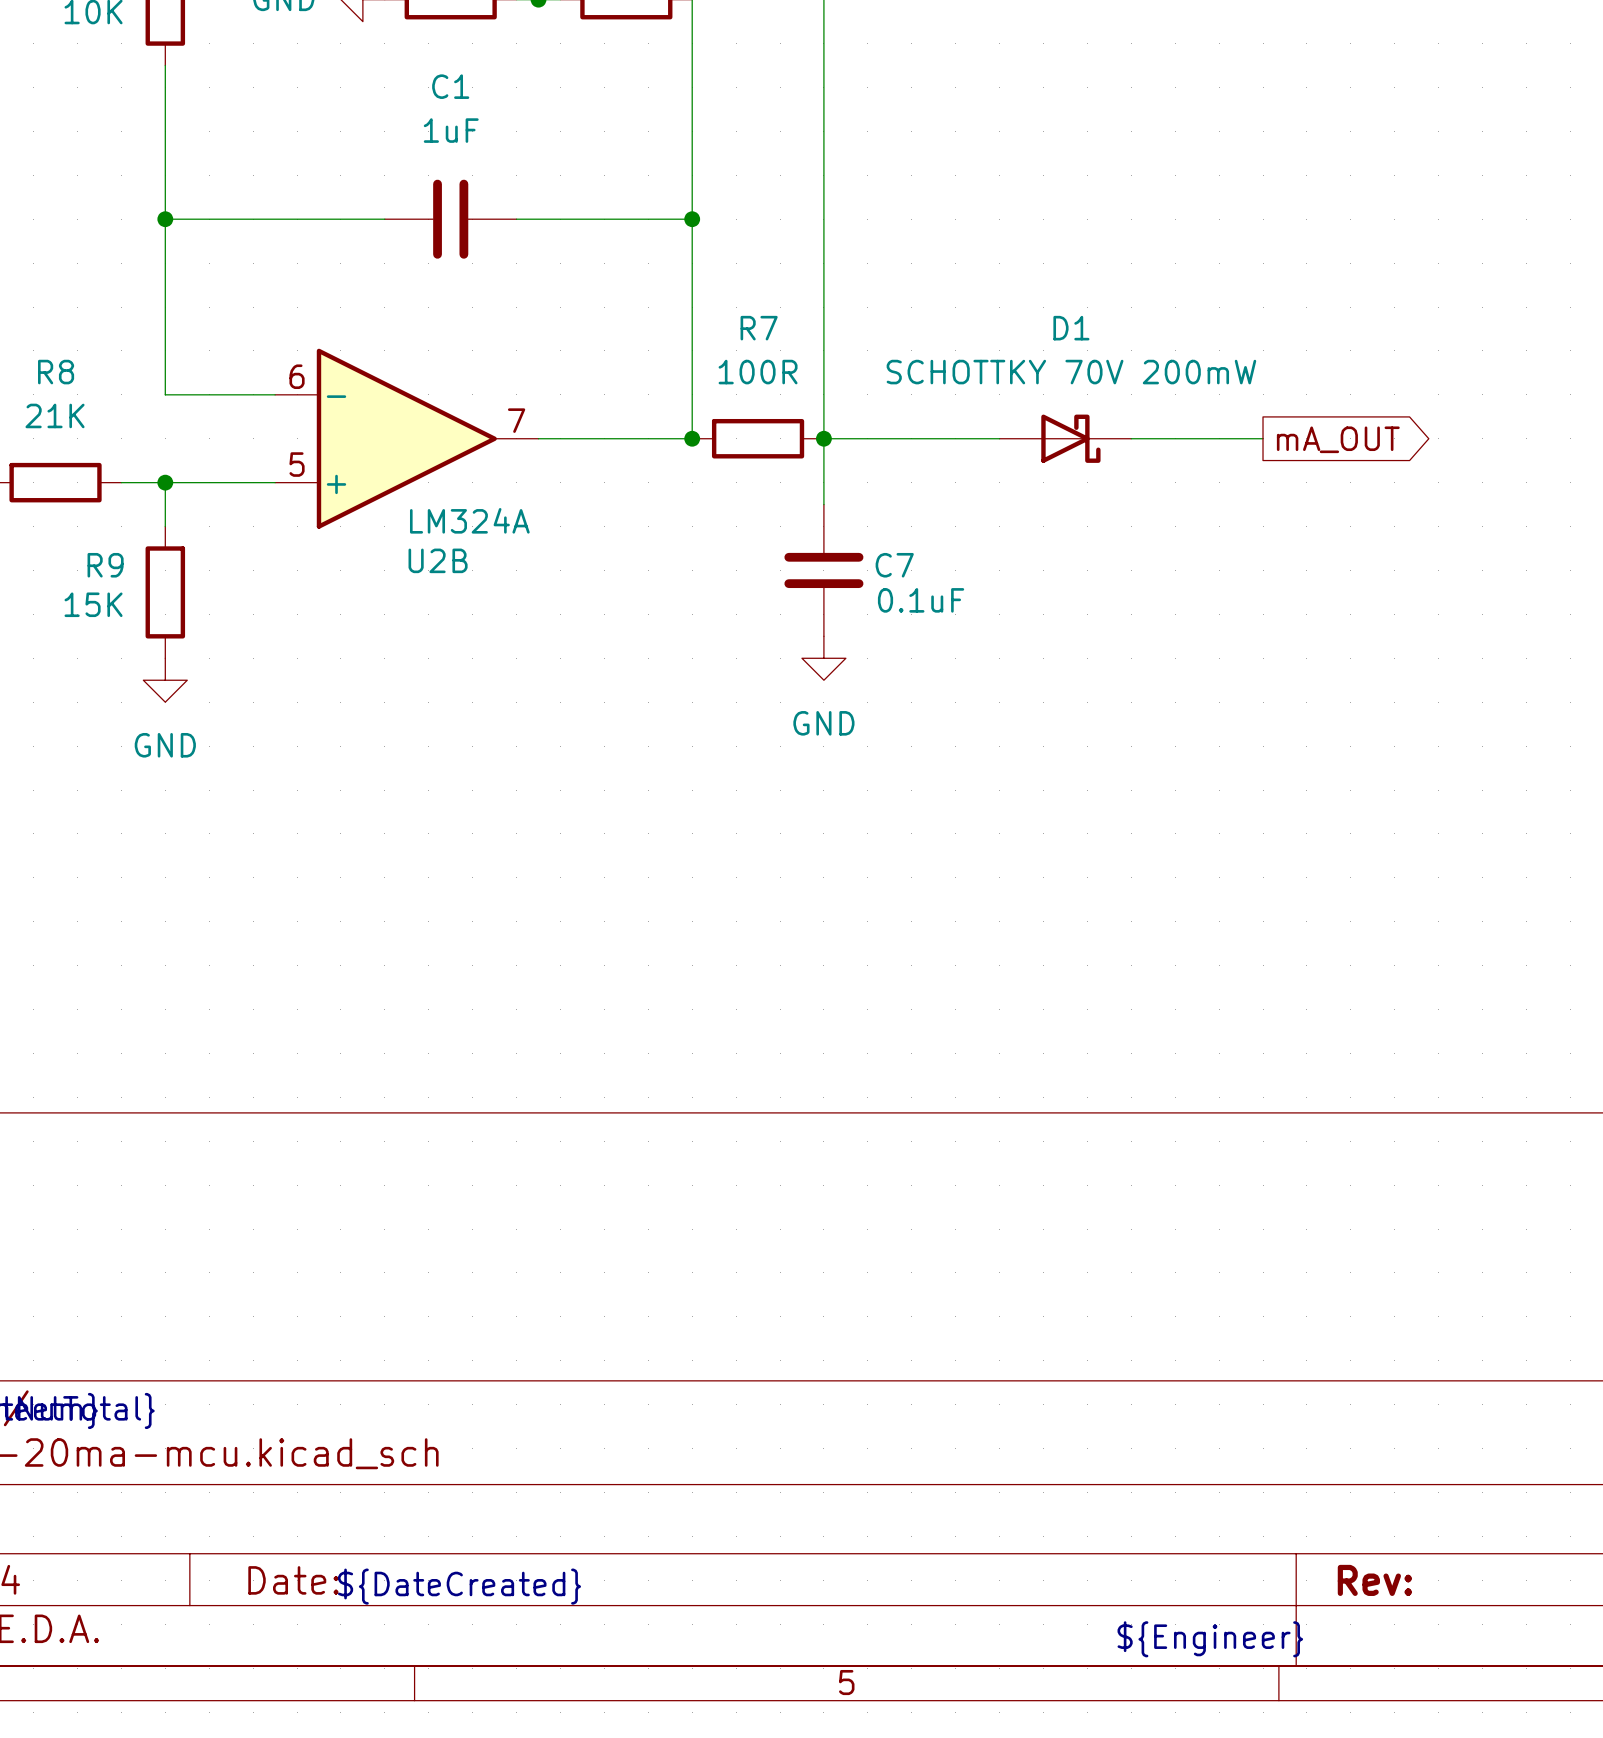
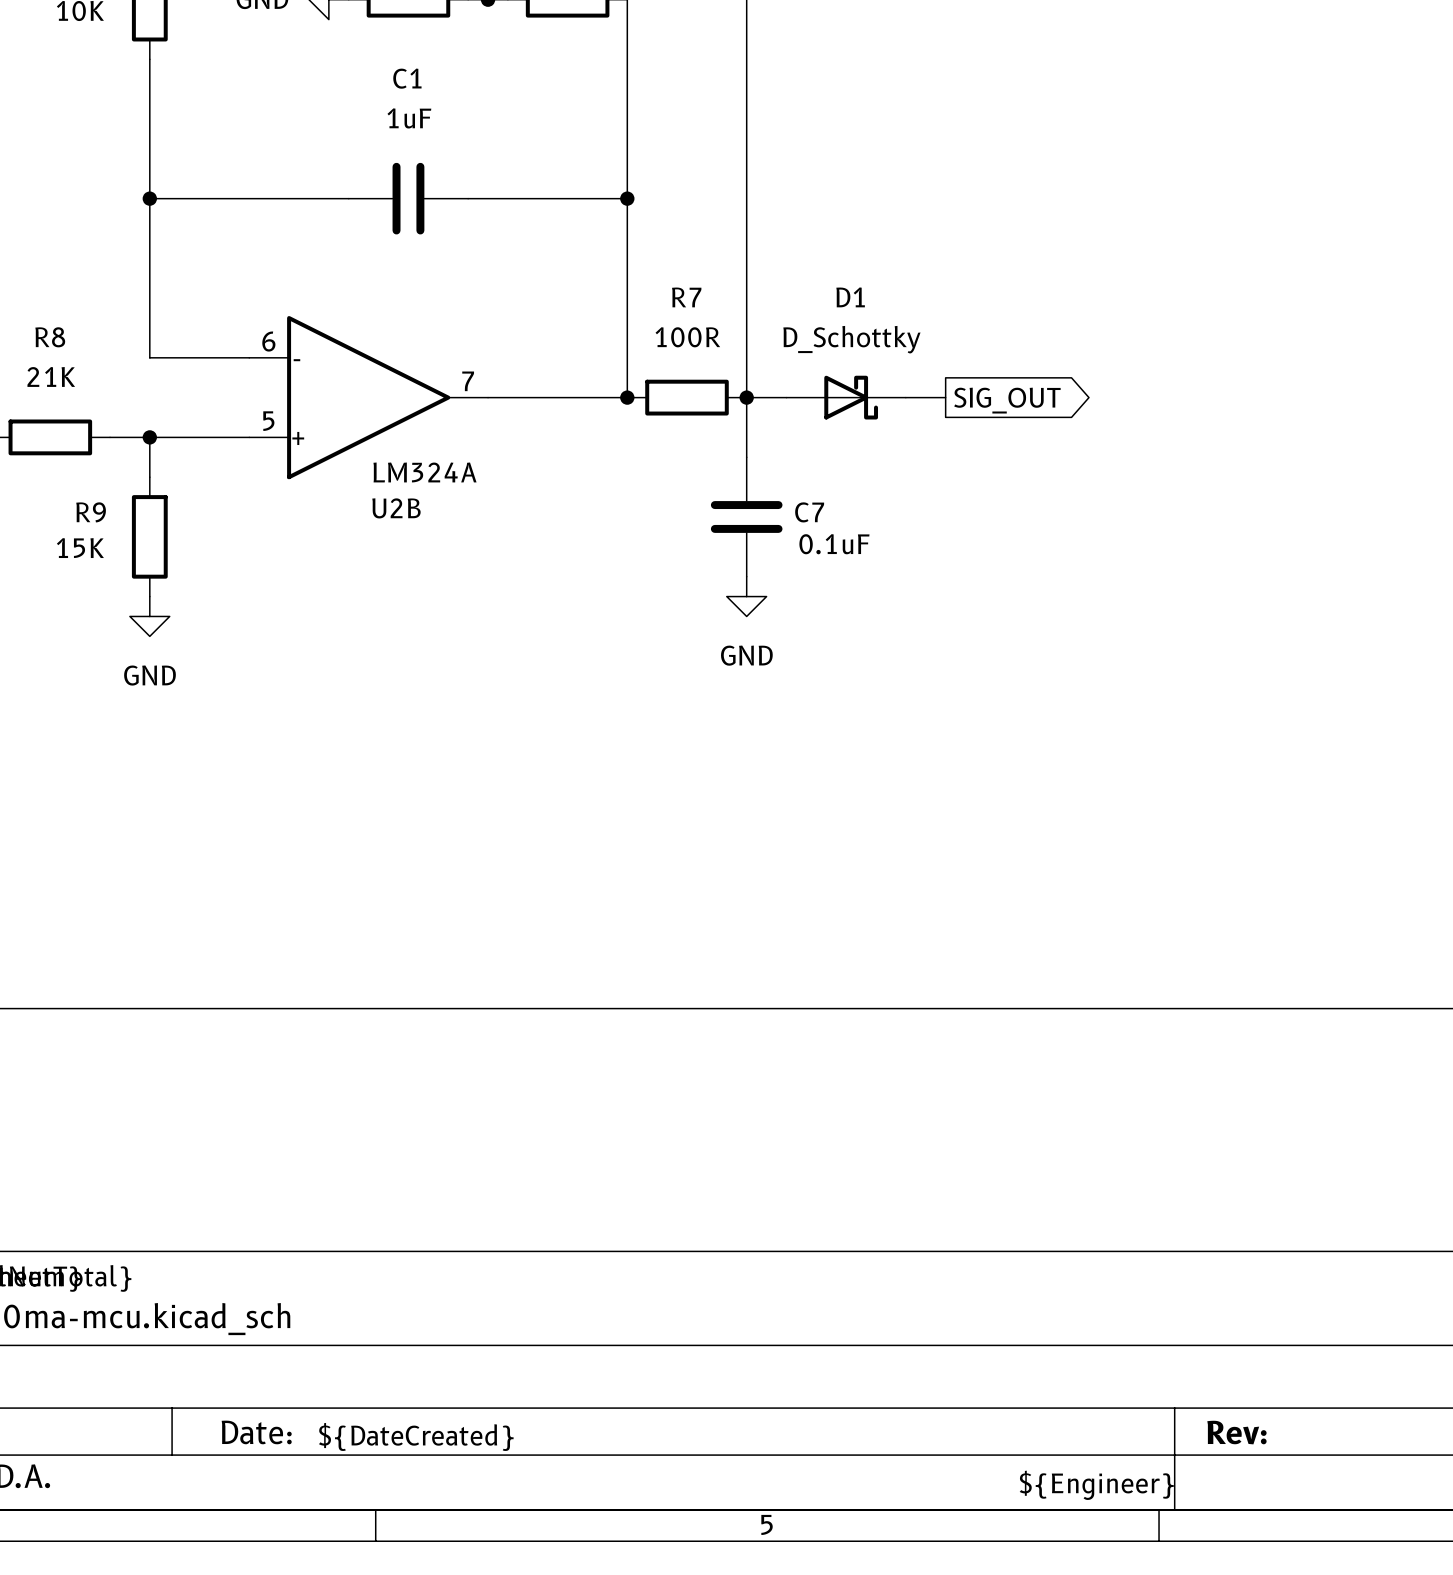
D1 value: SCHOTTKY 70V 200mW (1071, 372) -> D_Schottky (851, 339)
D1 position: (1065, 438) -> (846, 397)
wire: (1131, 438) (1263, 438) -> none
global label: none -> SIG_OUT (1007, 400)
global label: mA_OUT (1338, 439) -> none

